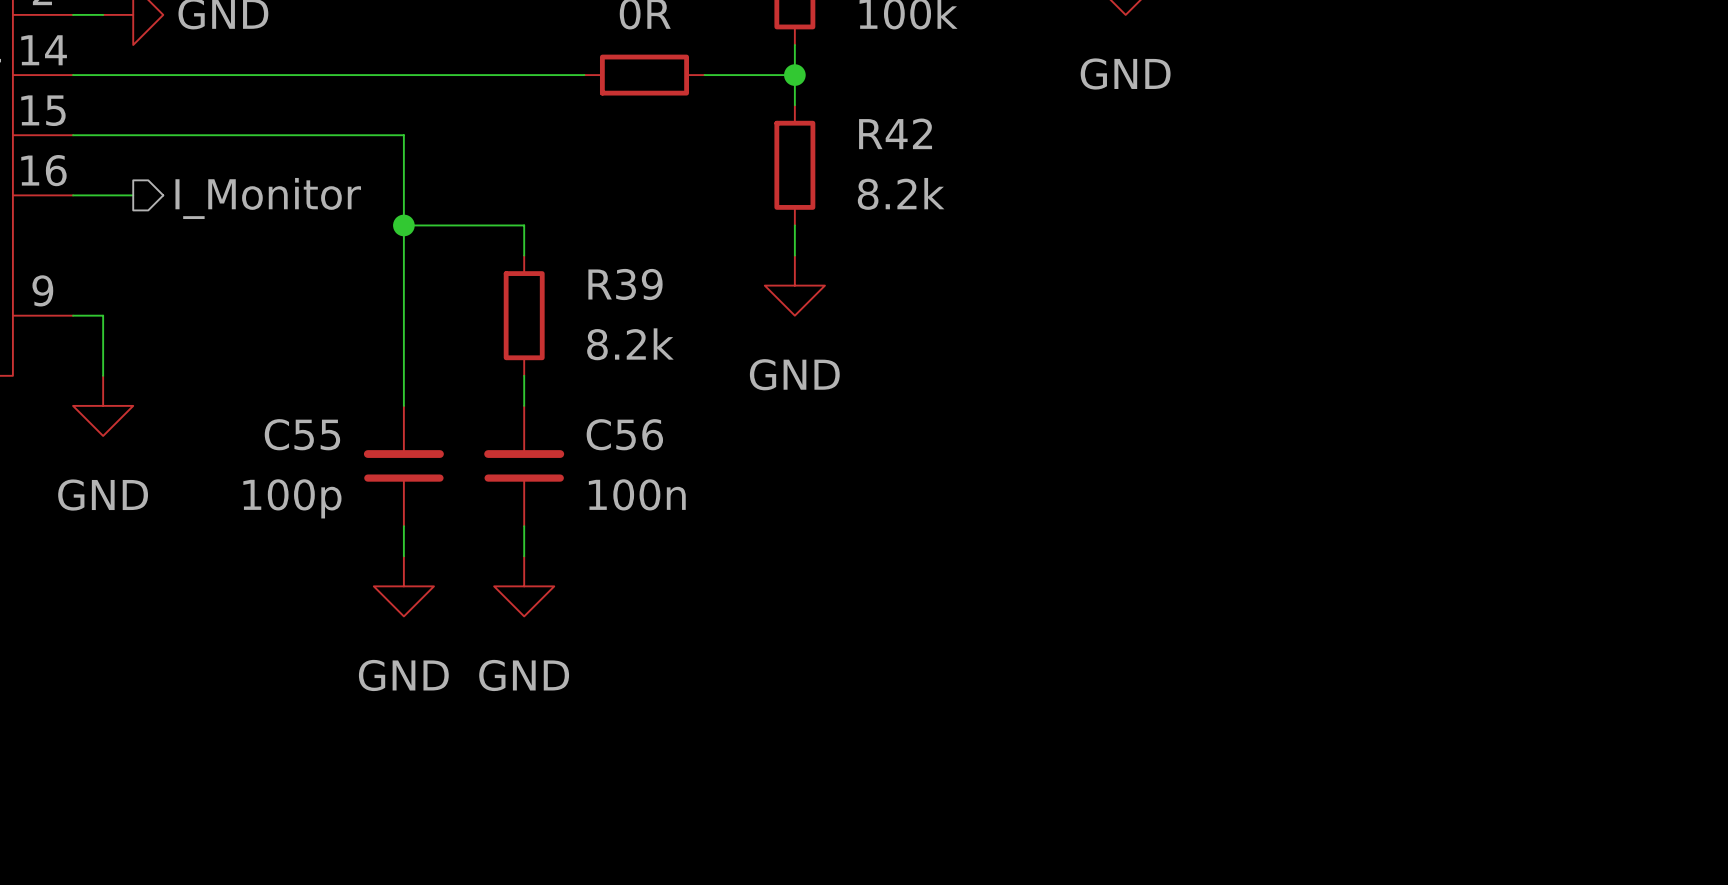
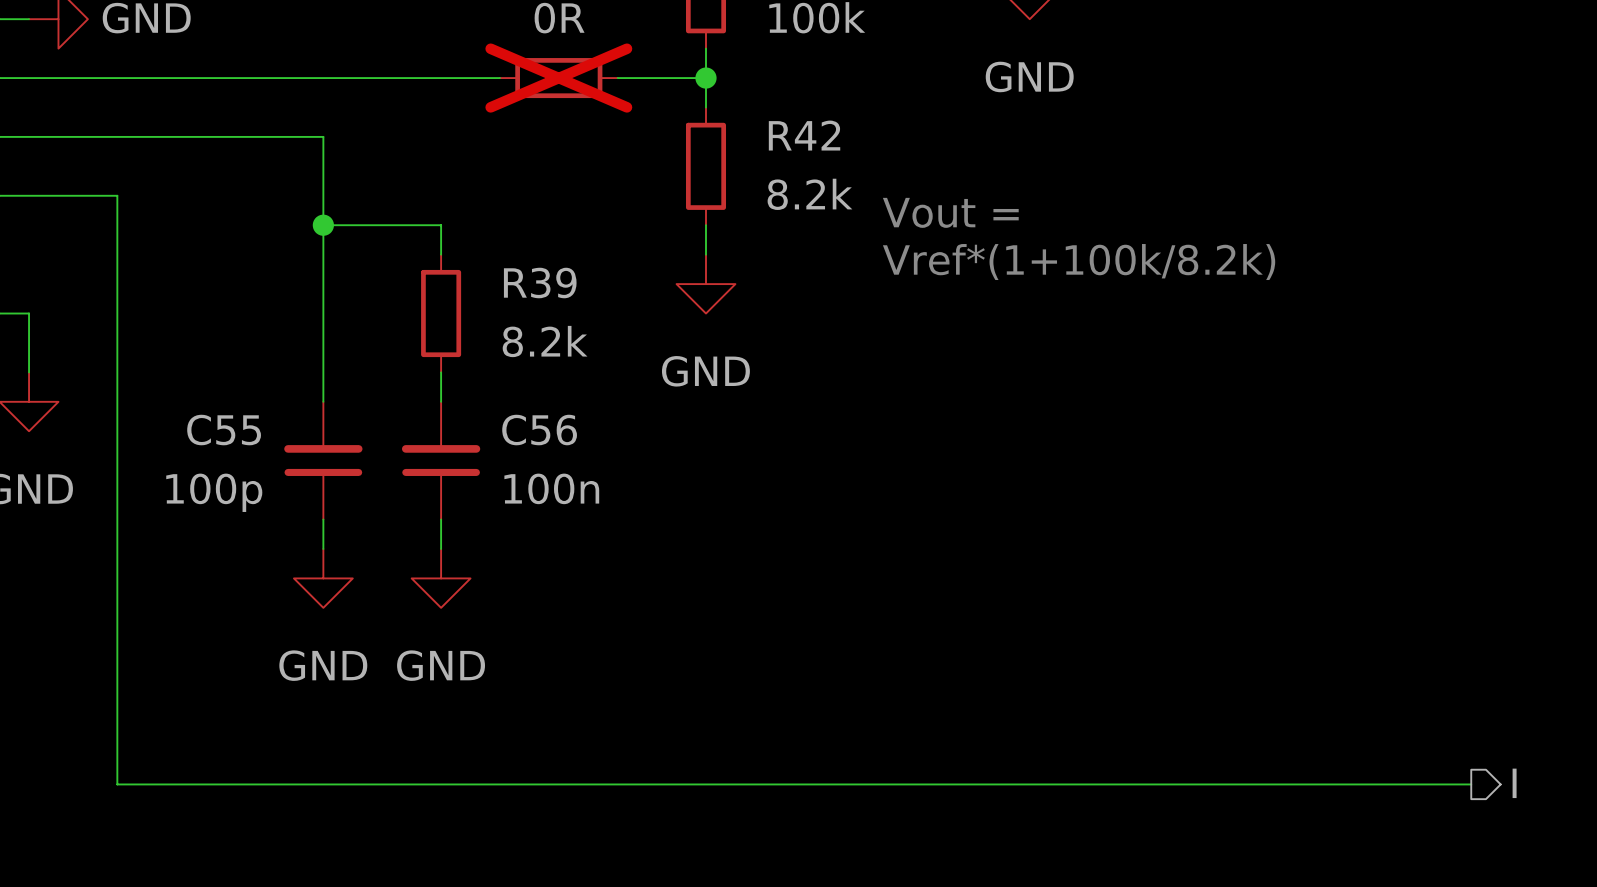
part do-not-place cross: none -> (558, 78)
wire: none -> (58, 195) (117, 195) (117, 784) (1471, 784)
hierarchical label: I_Monitor (268, 198) -> none
text: none -> Vout = (950, 212)
text: none -> Vref*(1+100k/8.2k) (1079, 262)
hierarchical label: none -> I (1514, 783)

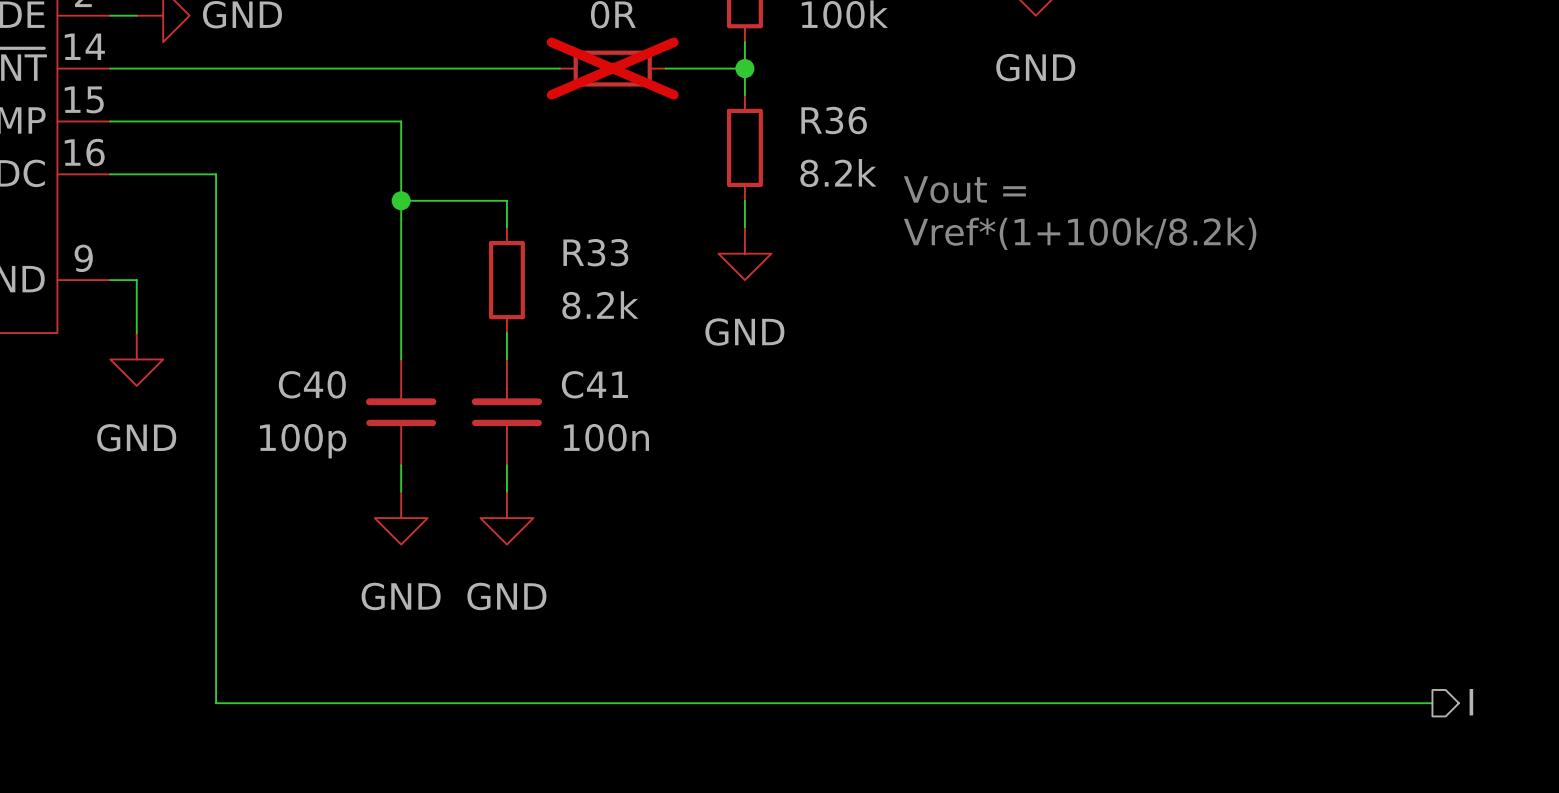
R42 name: R42 (804, 135) -> R36 (834, 120)
R39 name: R39 (540, 283) -> R33 (595, 252)
C55 name: C55 (224, 430) -> C40 (312, 384)
C56 name: C56 (539, 430) -> C41 (594, 384)

